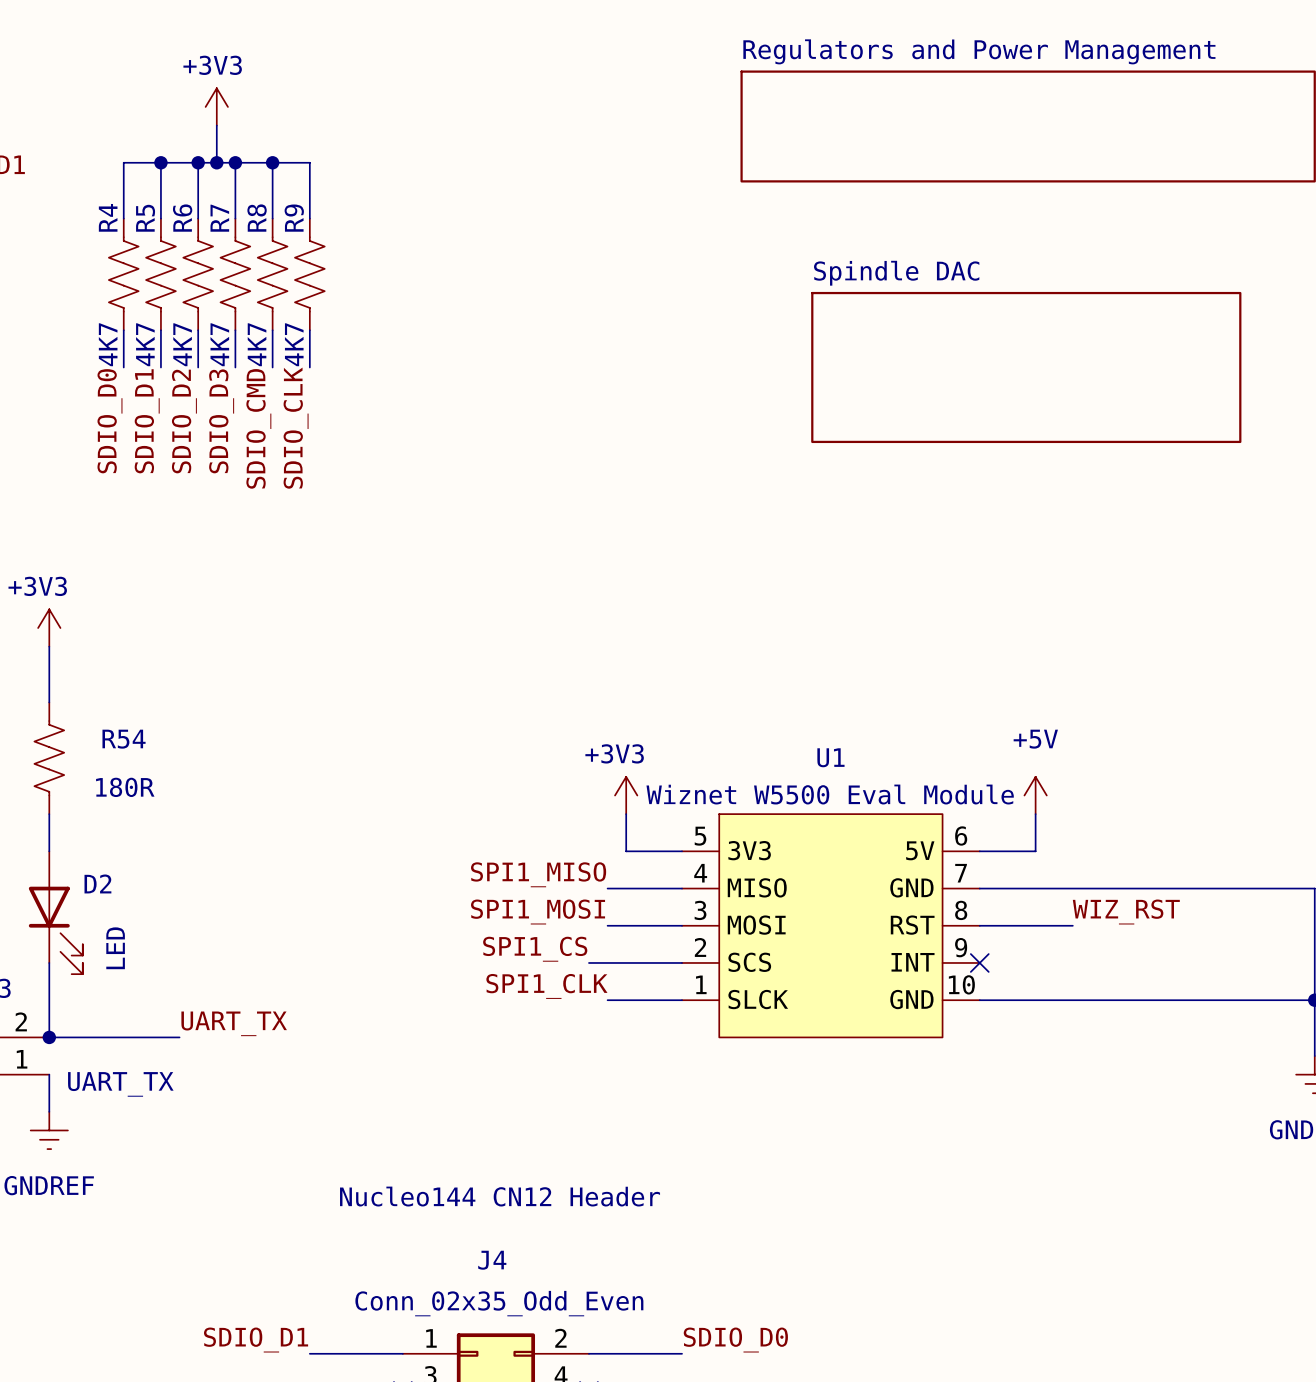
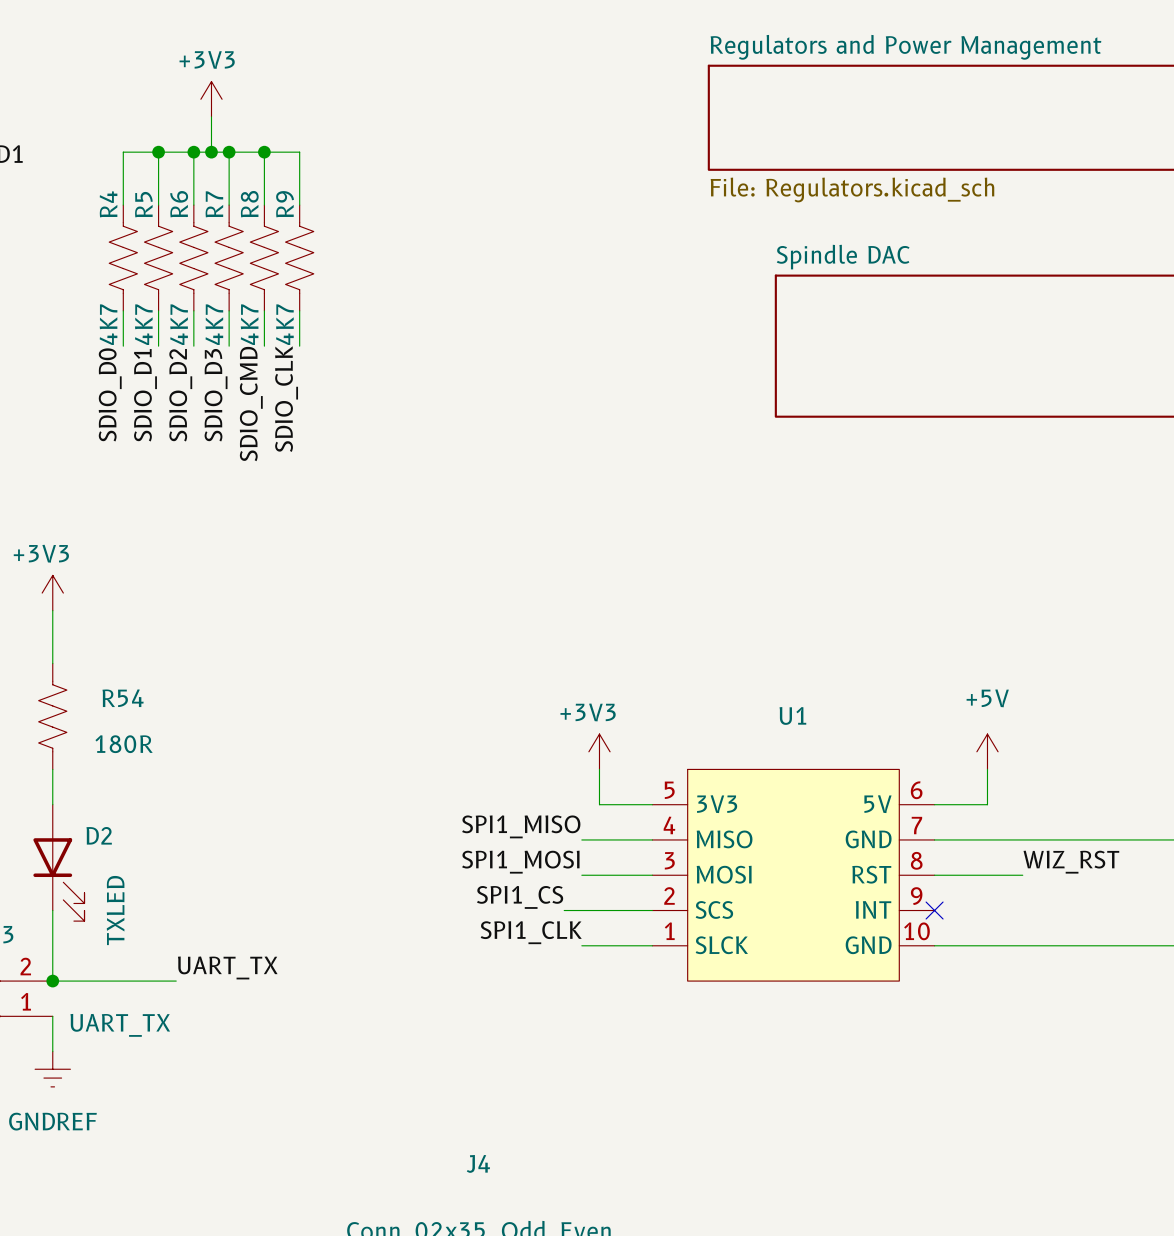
sheet Regulators and Power Management value: none -> File: Regulators.kicad_sch (852, 189)
U1 value: Wiznet W5500 Eval Module (830, 794) -> none
D2 value: LED (115, 948) -> TXLED (115, 910)
text: Nucleo144 CN12 Header (500, 1196) -> none
J4 name position: J4 (492, 1260) -> J4 (478, 1163)

